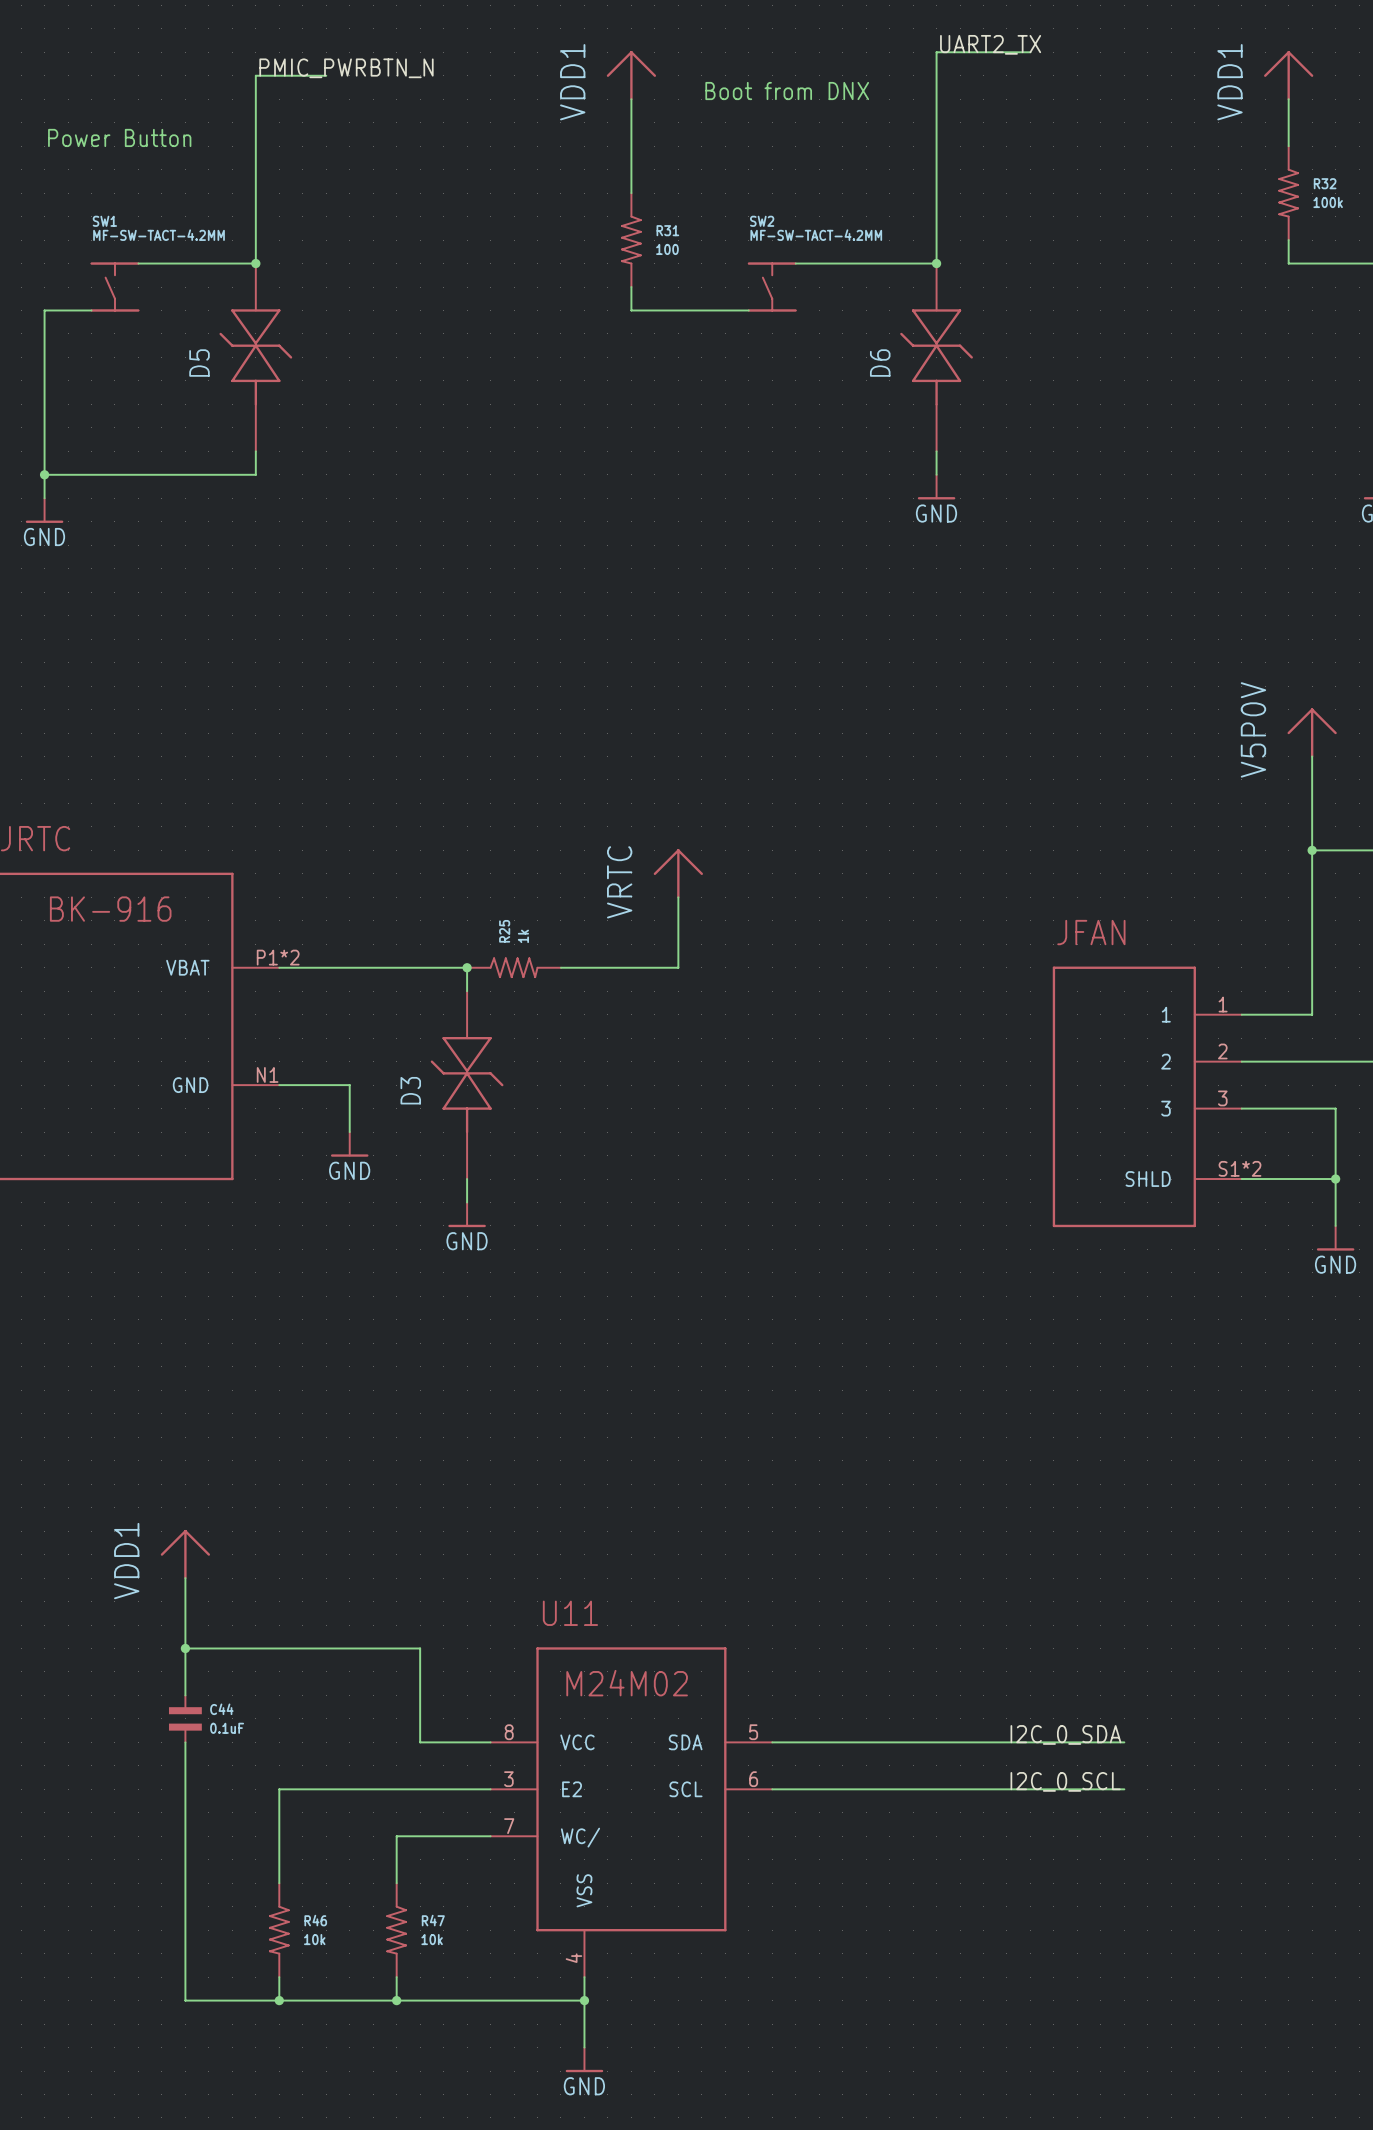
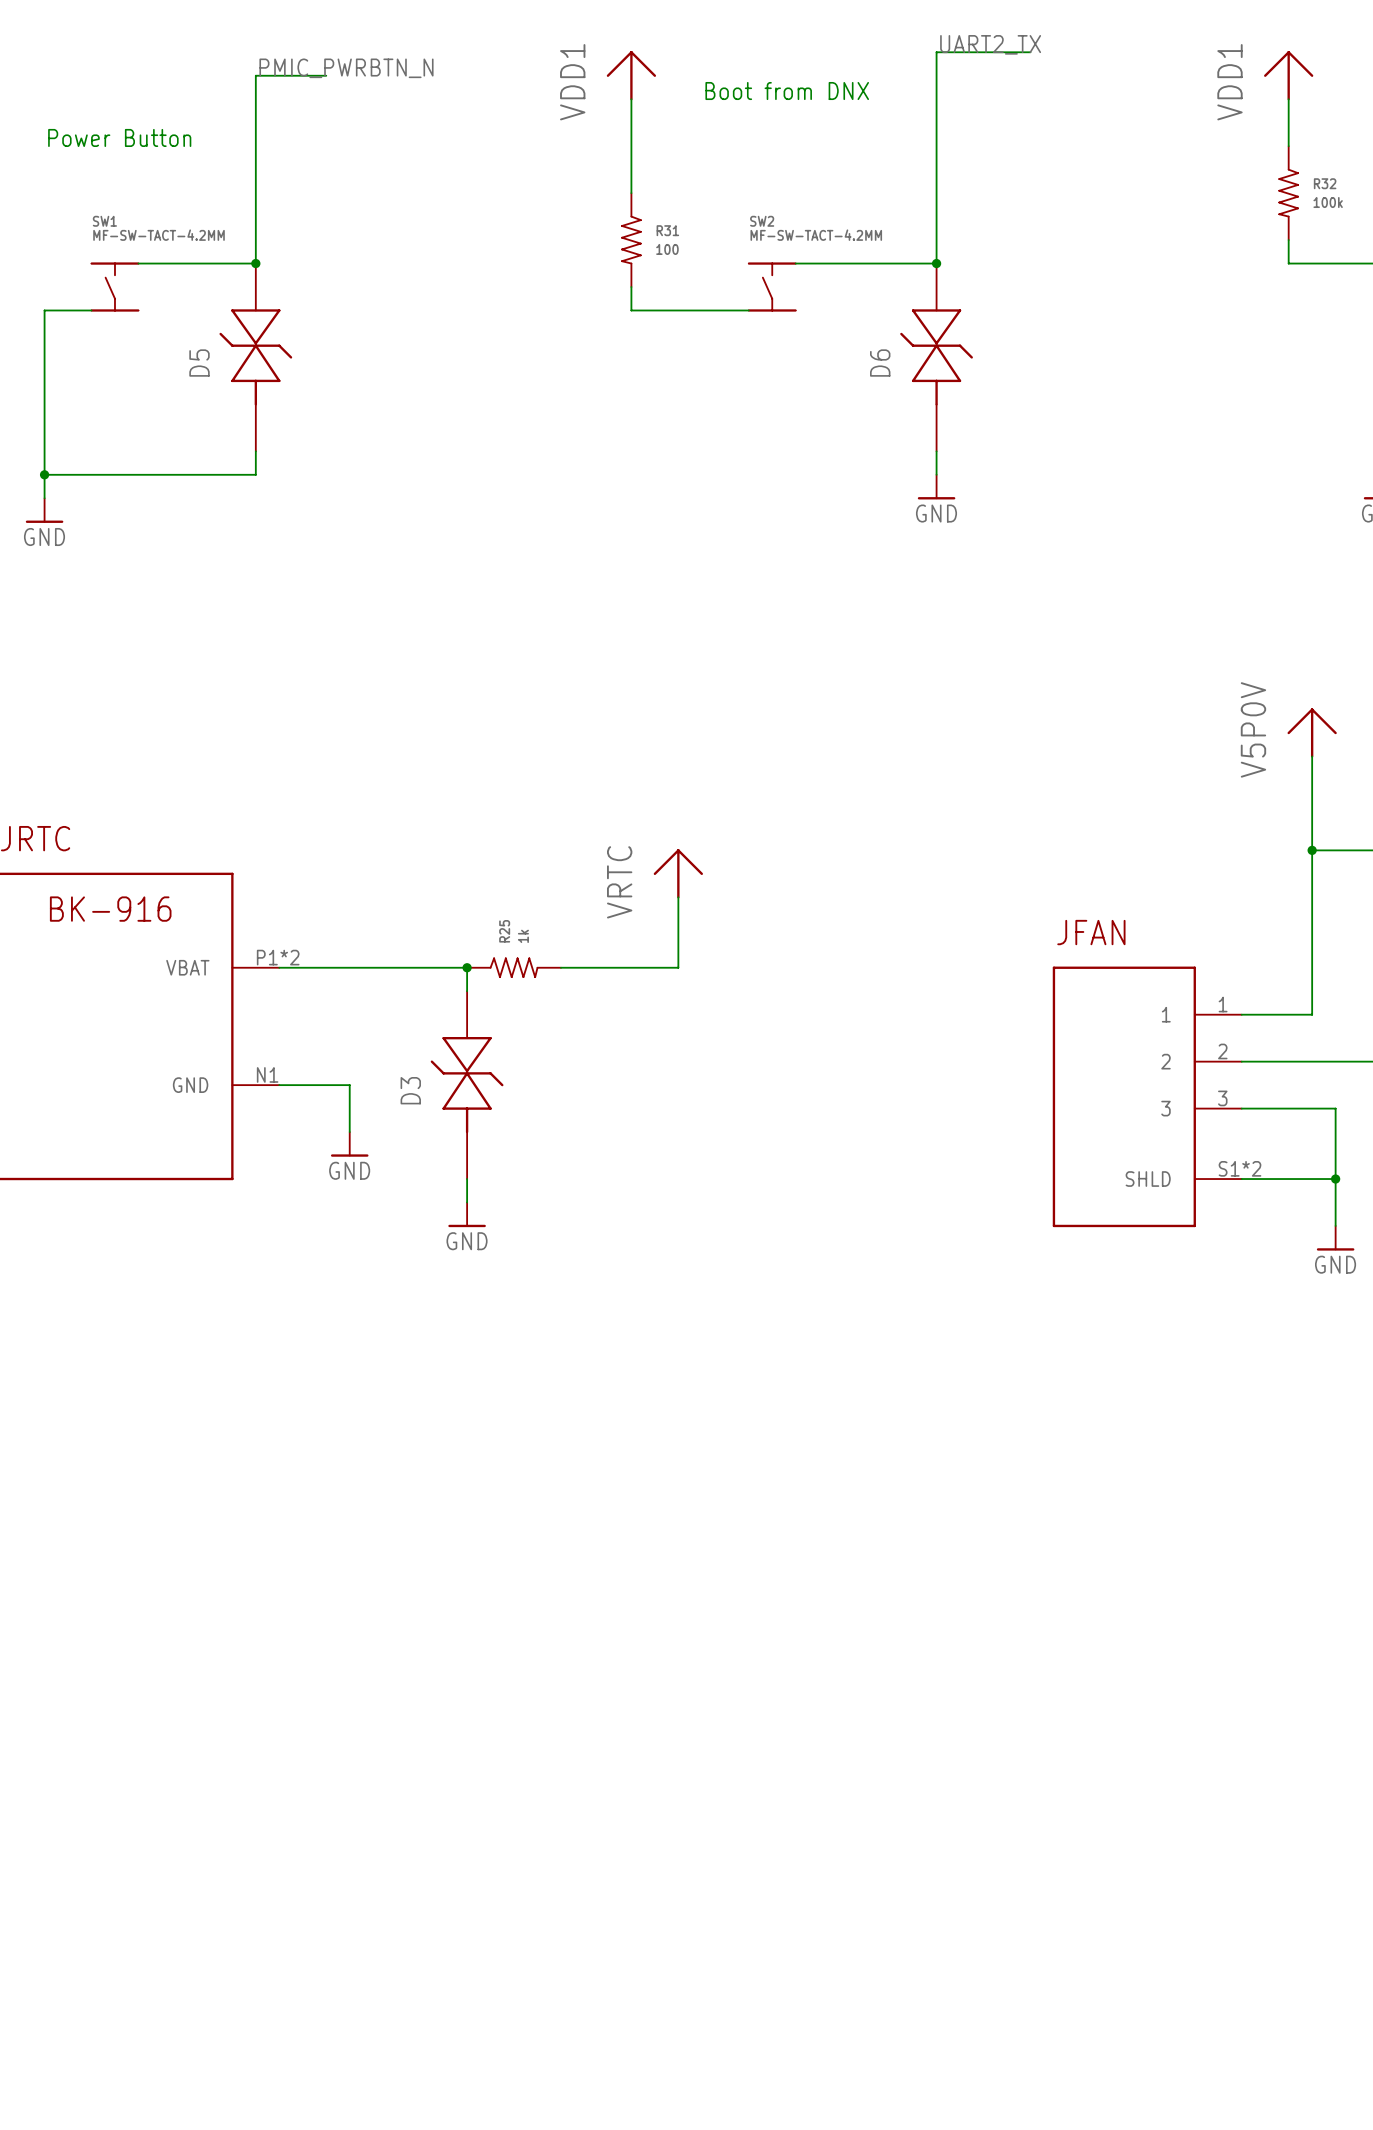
power symbol: VDD1 (185, 1554) -> none
wire: (185, 1578) (185, 1695) -> none
wire: (185, 1648) (420, 1648) (420, 1742) (490, 1742) -> none
junction: (185, 1648) -> none
C44: 0.1uF (185, 1718) -> none
label: I2C_0_SDA (1065, 1734) -> none
wire: (185, 1742) (185, 2000) (584, 2000) -> none
wire: (772, 1742) (1124, 1742) -> none
label: I2C_0_SCL (1065, 1781) -> none
wire: (490, 1789) (279, 1789) (279, 1883) -> none
wire: (772, 1789) (1124, 1789) -> none
U11: (631, 1812) -> none
wire: (490, 1836) (396, 1836) (396, 1883) -> none
R46: 10k (279, 1930) -> none
R47: 10k (396, 1930) -> none
wire: (279, 1977) (279, 2000) -> none
wire: (396, 1977) (396, 2000) -> none
wire: (584, 1977) (584, 2047) -> none
junction: (279, 2000) -> none
junction: (396, 2000) -> none
junction: (584, 2000) -> none
power symbol: GND (584, 2059) -> none

